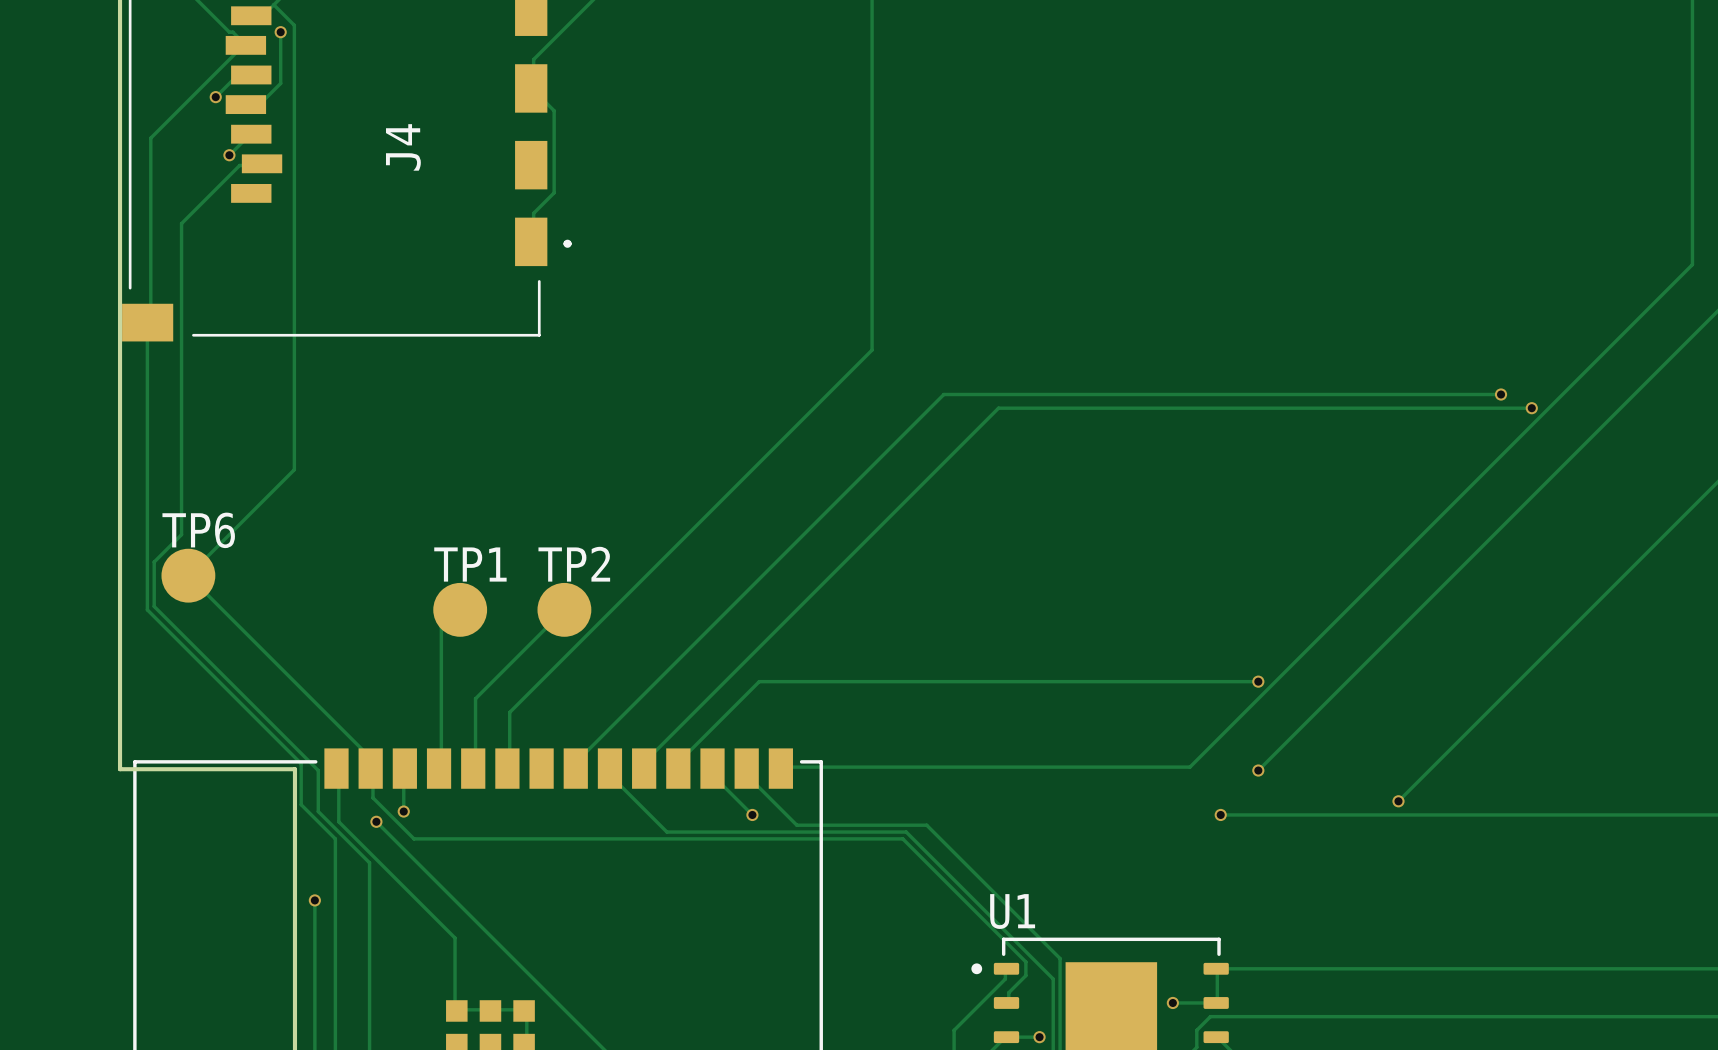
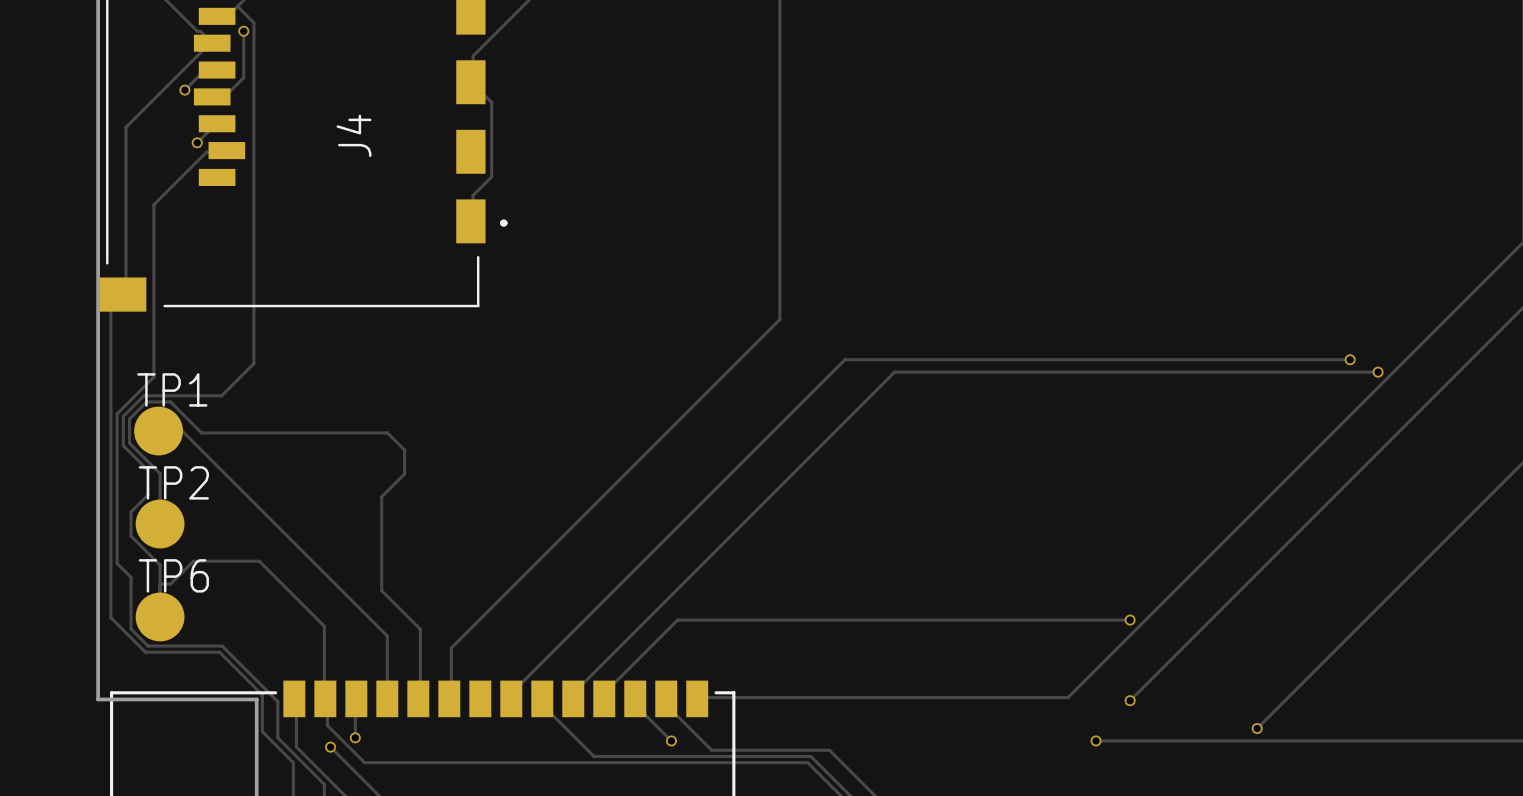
track: (291, 22) (294, 25) (294, 469) (188, 575) (369, 756) -> (253, 22) (253, 363) (221, 395) (143, 395) (123, 416) (123, 445) (148, 470) (148, 494) (131, 511) (131, 536) (160, 565) (160, 616)
track: (147, 322) (147, 609) (301, 764) -> (123, 294) (110, 306) (110, 617) (145, 652) (219, 652) (262, 694)
track: (181, 413) (181, 534) (154, 562) (154, 606) (318, 771) -> (153, 377) (117, 413) (117, 563) (131, 577) (131, 629) (148, 646) (222, 646) (277, 701)
TP6 name: TP6 (198, 530) -> TP2 (173, 482)
track: (460, 609) (441, 626) (441, 767) (439, 768) -> (158, 431) (182, 431) (387, 636) (387, 698)
TP1 position: (460, 609) -> (158, 431)
track: (564, 609) (475, 698) -> (160, 524) (160, 473) (129, 443) (129, 419) (146, 401) (170, 401) (201, 432) (387, 432) (404, 449) (404, 474) (381, 496) (381, 590) (420, 629) (420, 635)
TP2: (564, 609) -> none
track: none -> (160, 584) (170, 584) (193, 561) (259, 561) (324, 626) (324, 688)
TP6: none -> (160, 616)

